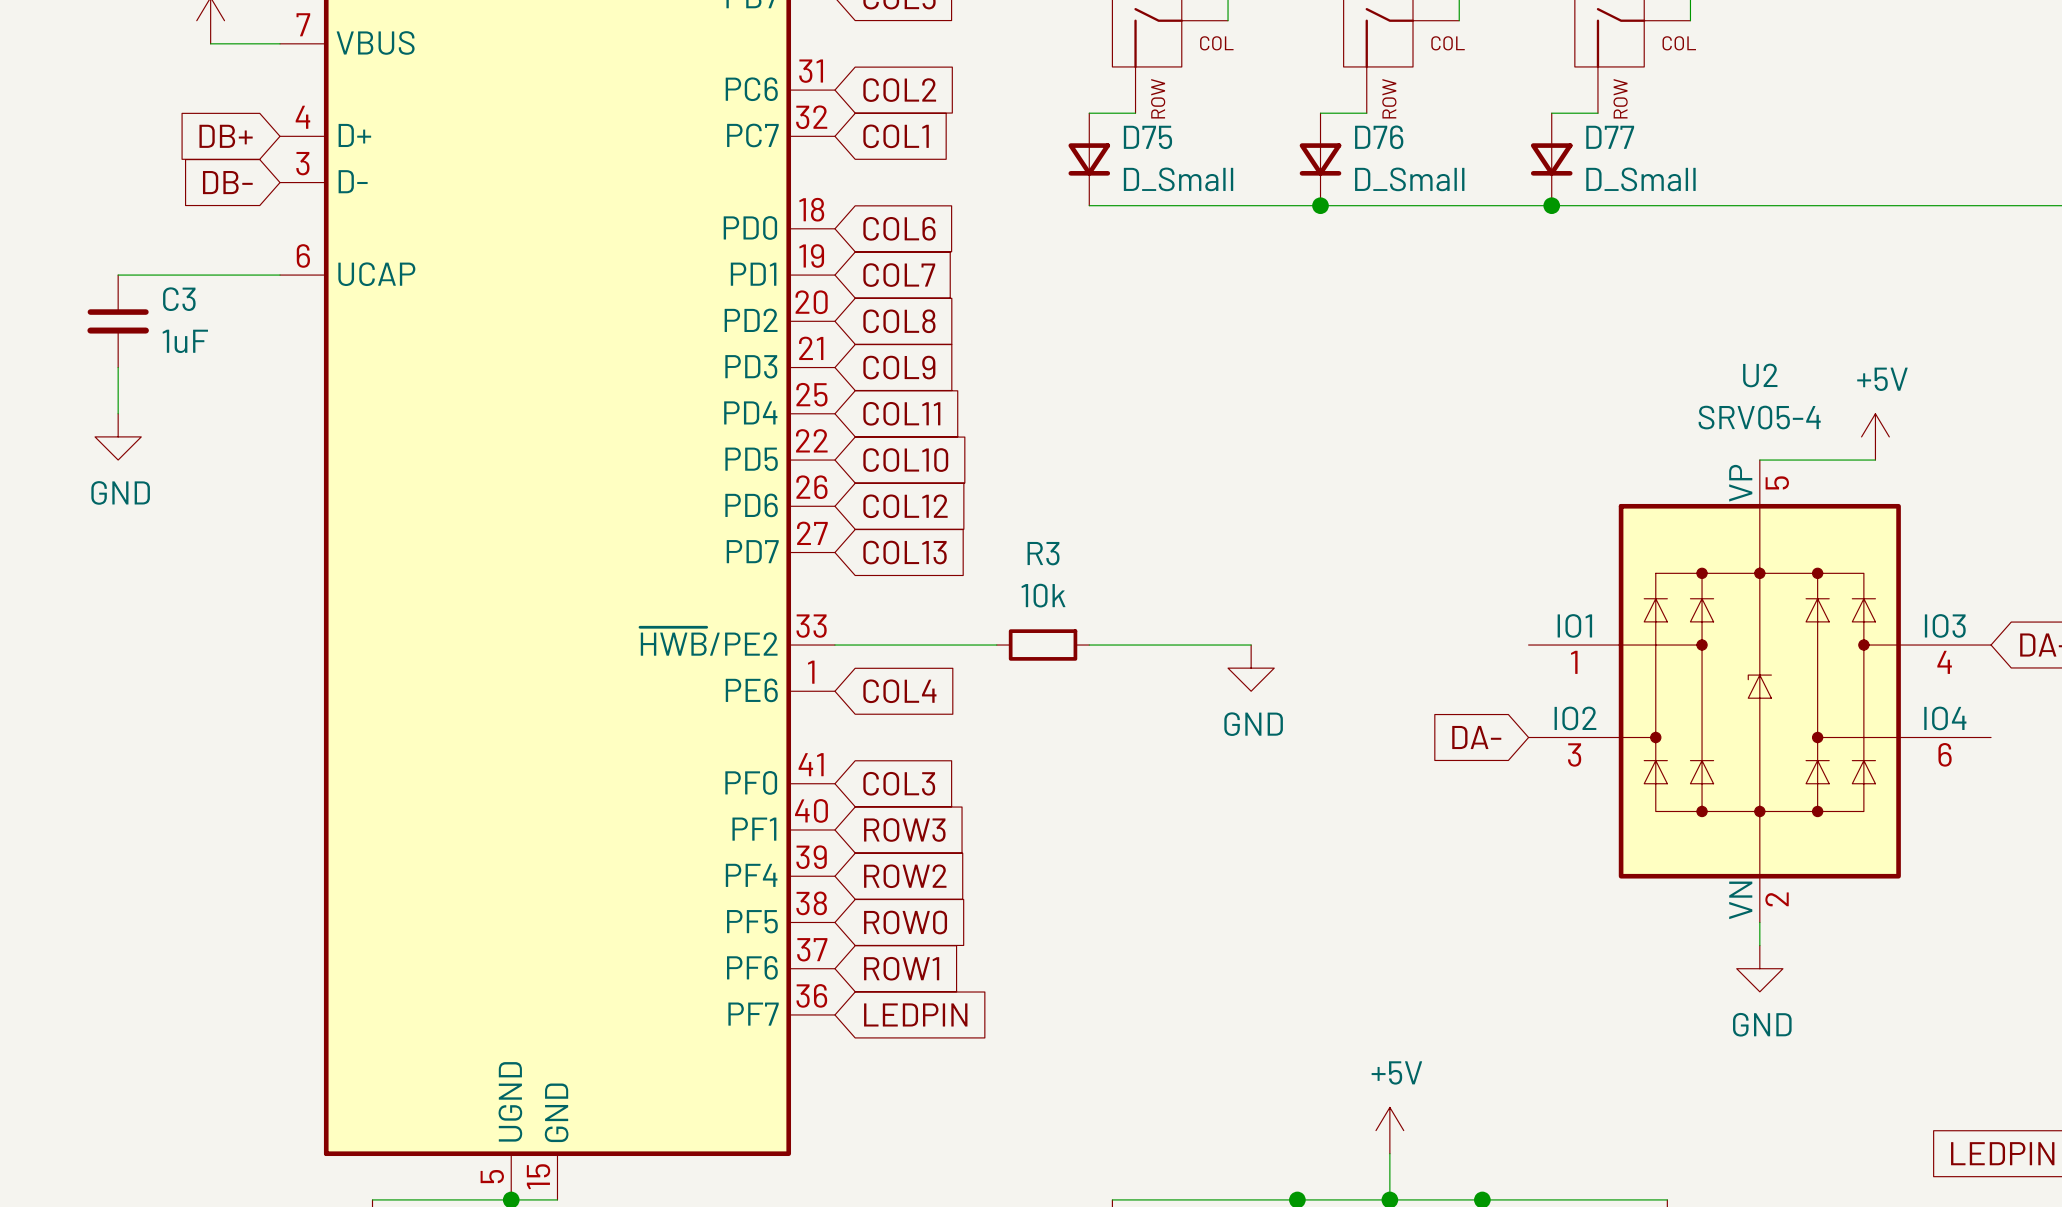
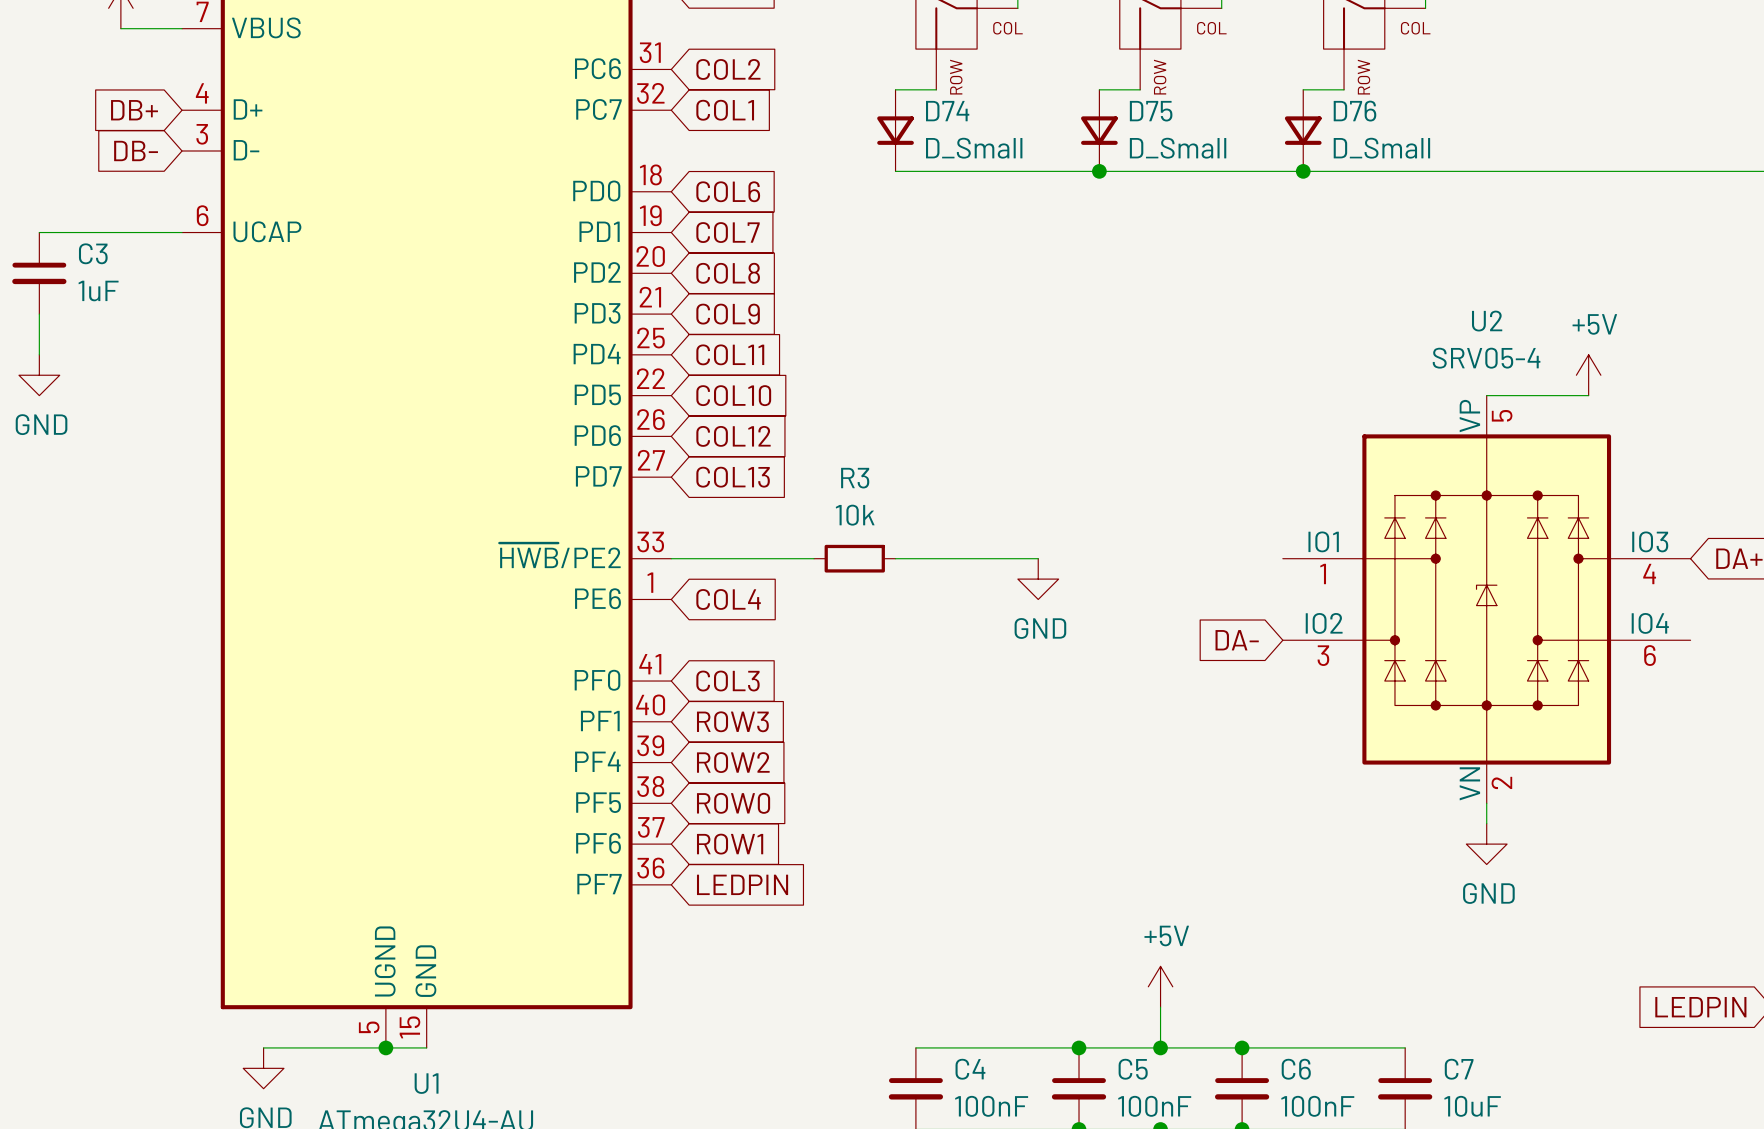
D75 name: D75 (1147, 137) -> D74 (947, 111)
D76 name: D76 (1379, 137) -> D75 (1151, 111)
D77 name: D77 (1610, 137) -> D76 (1354, 111)

